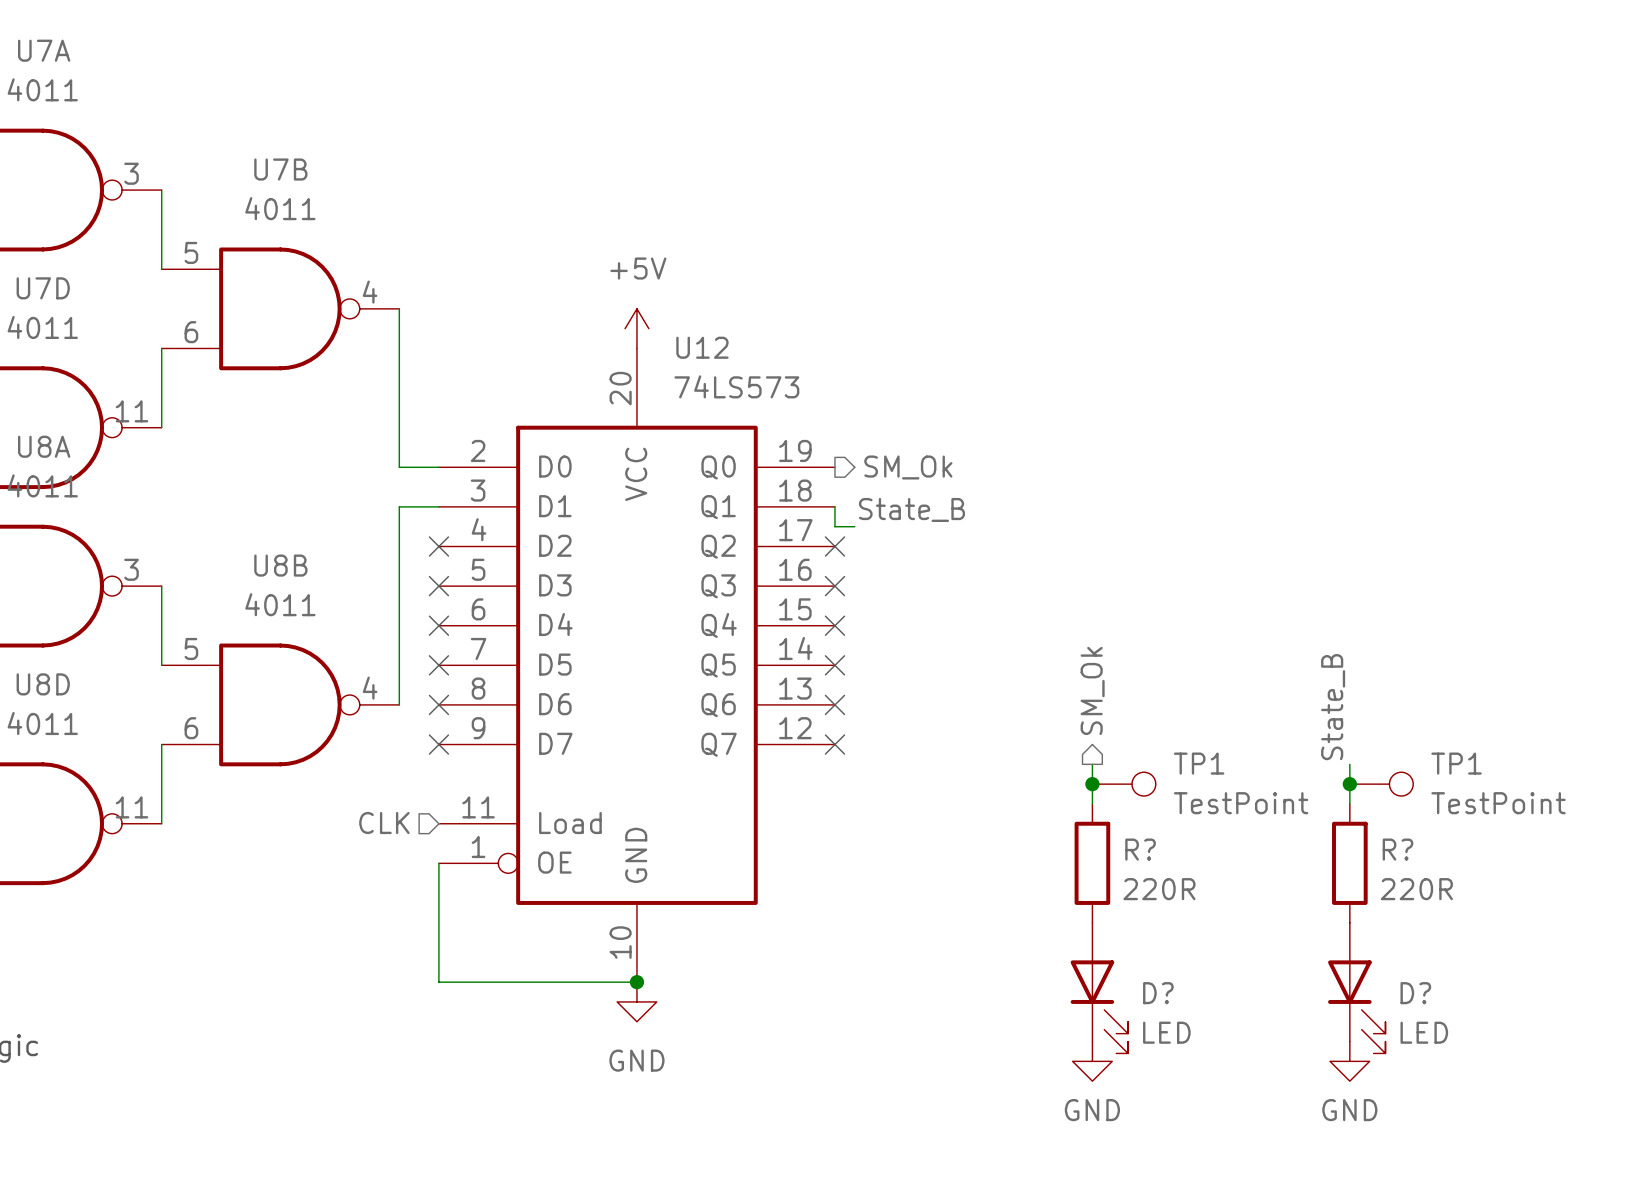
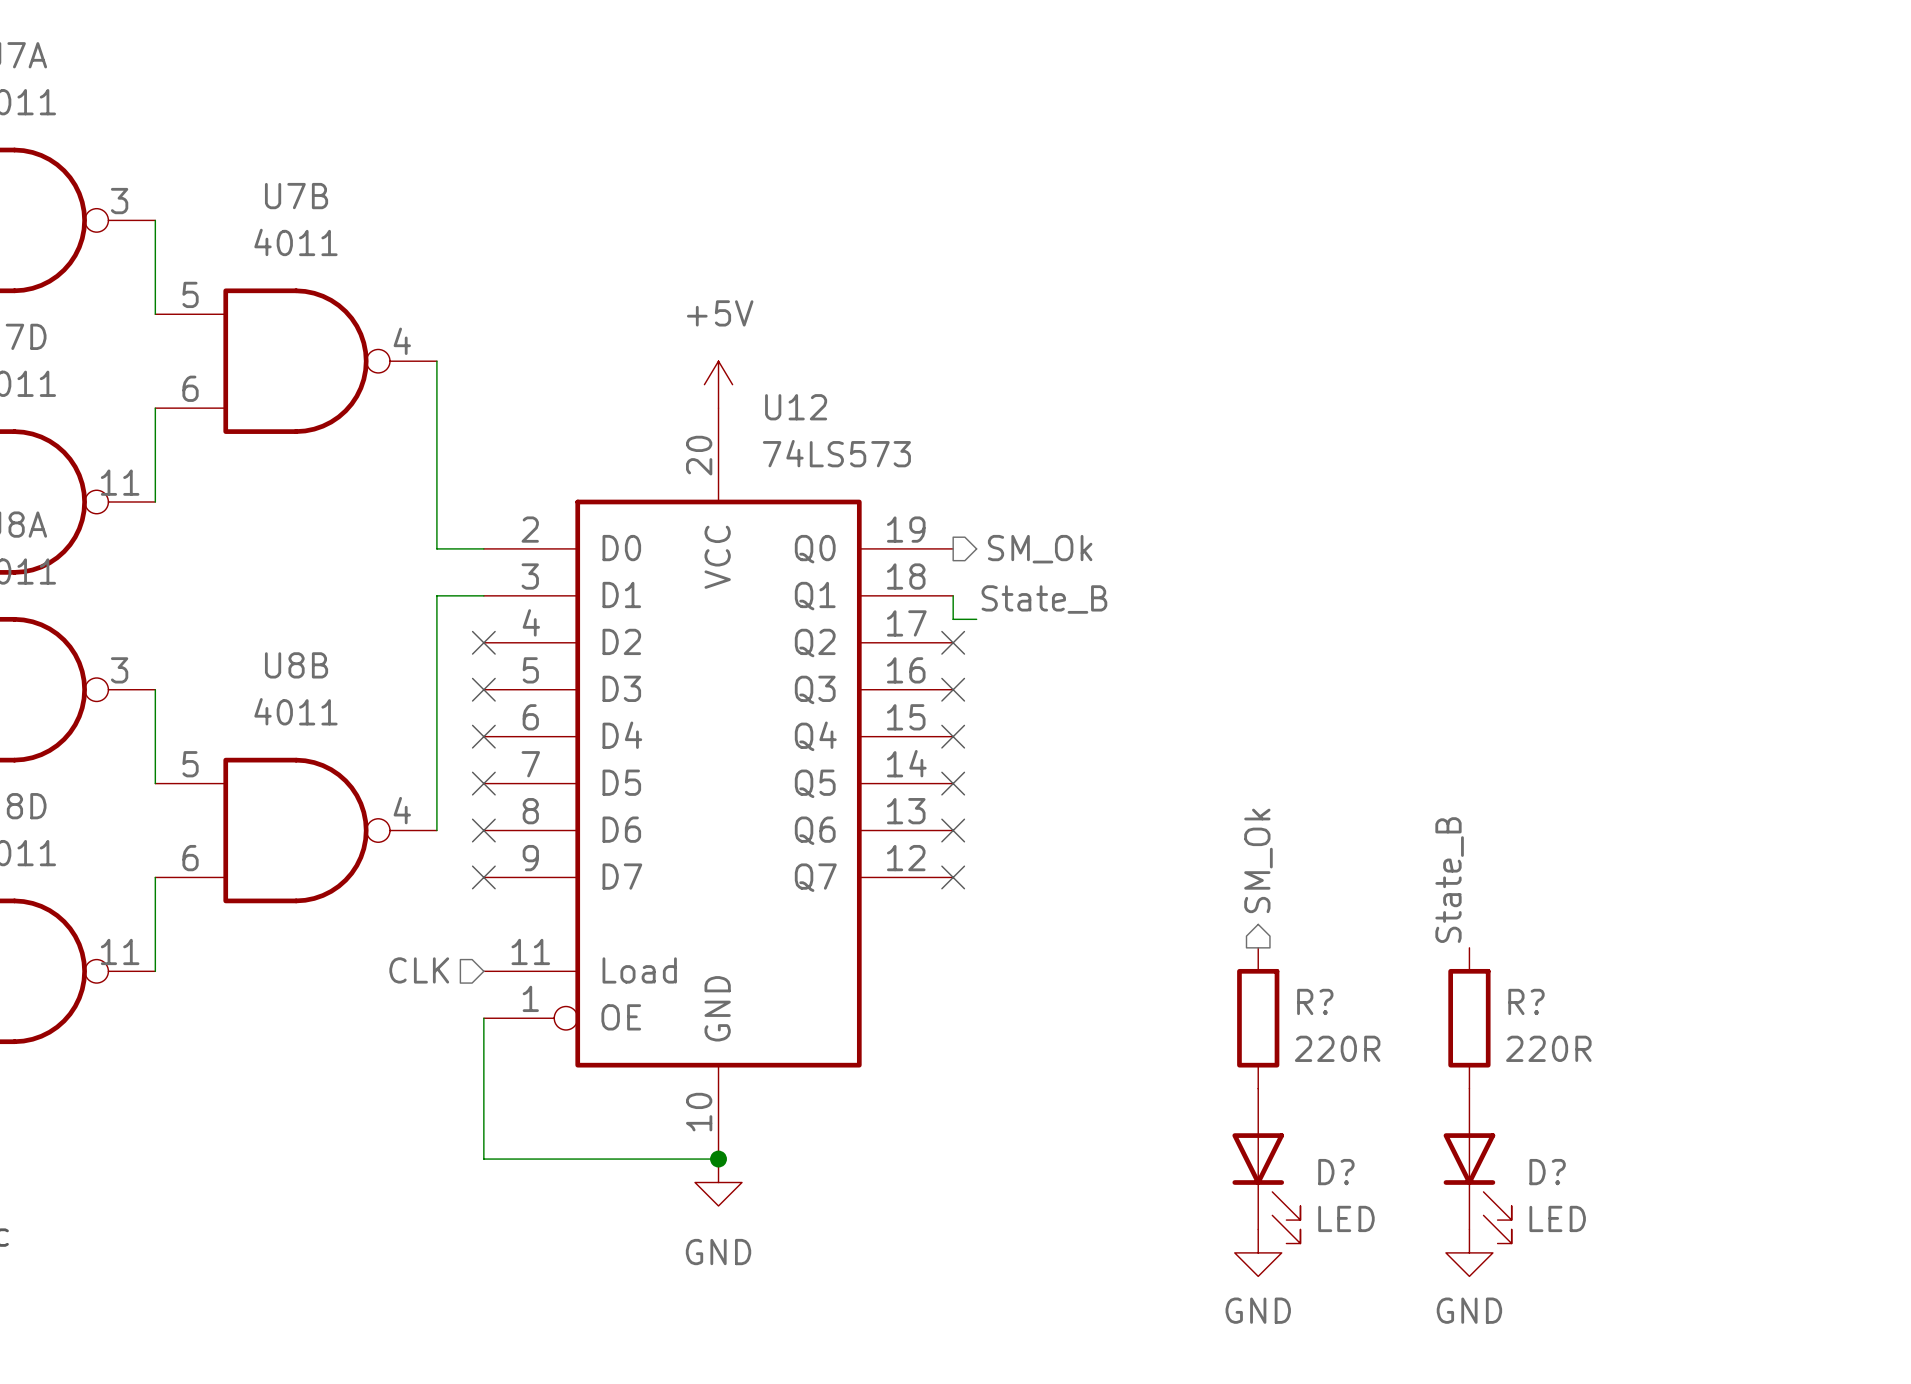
hierarchical label position: SM_Ok (1092, 690) -> SM_Ok (1258, 860)
label position: State_B (1333, 707) -> State_B (1449, 880)
wire: (1092, 764) (1092, 803) -> none
wire: (1349, 764) (1349, 803) -> none
junction: (1092, 784) -> none
TP1: TestPoint (1124, 784) -> none
junction: (1349, 784) -> none
TP1: TestPoint (1381, 784) -> none
R? position: (1349, 863) -> (1469, 1018)
D? position: (1356, 988) -> (1477, 1166)
power symbol position: GND (1349, 1061) -> GND (1469, 1252)

